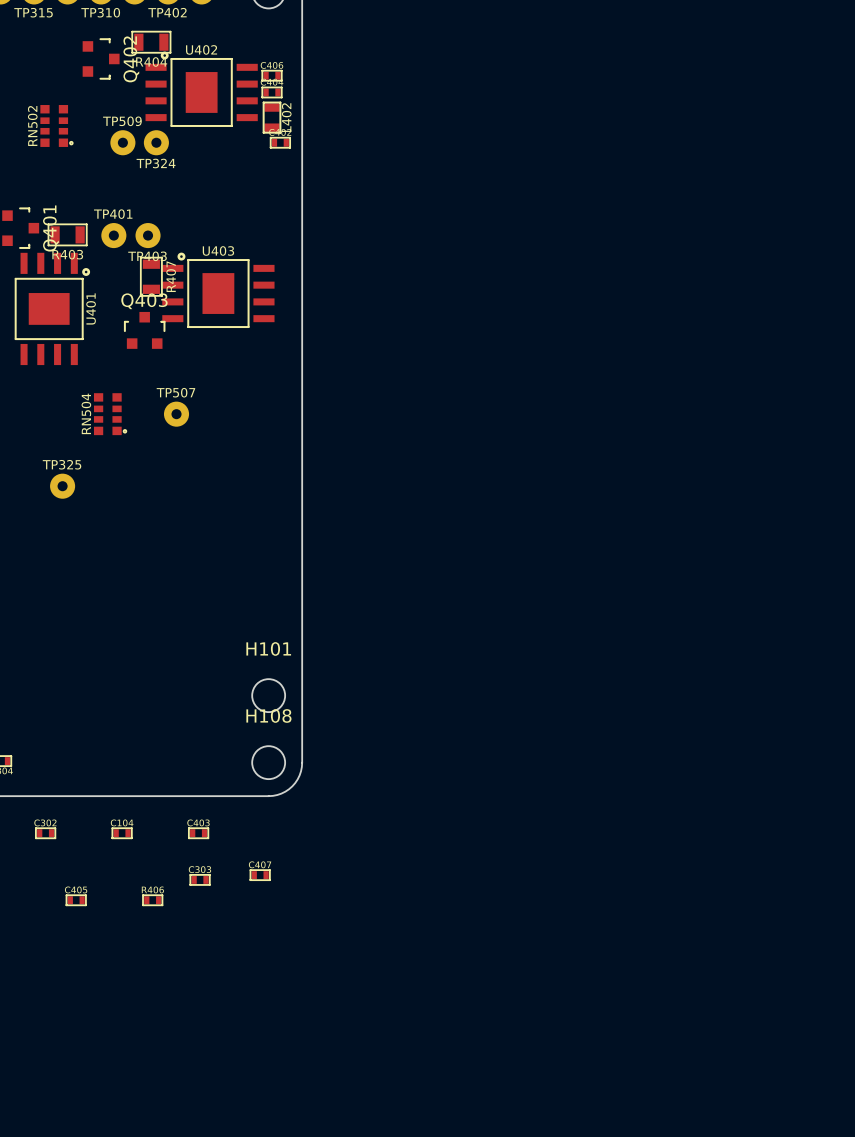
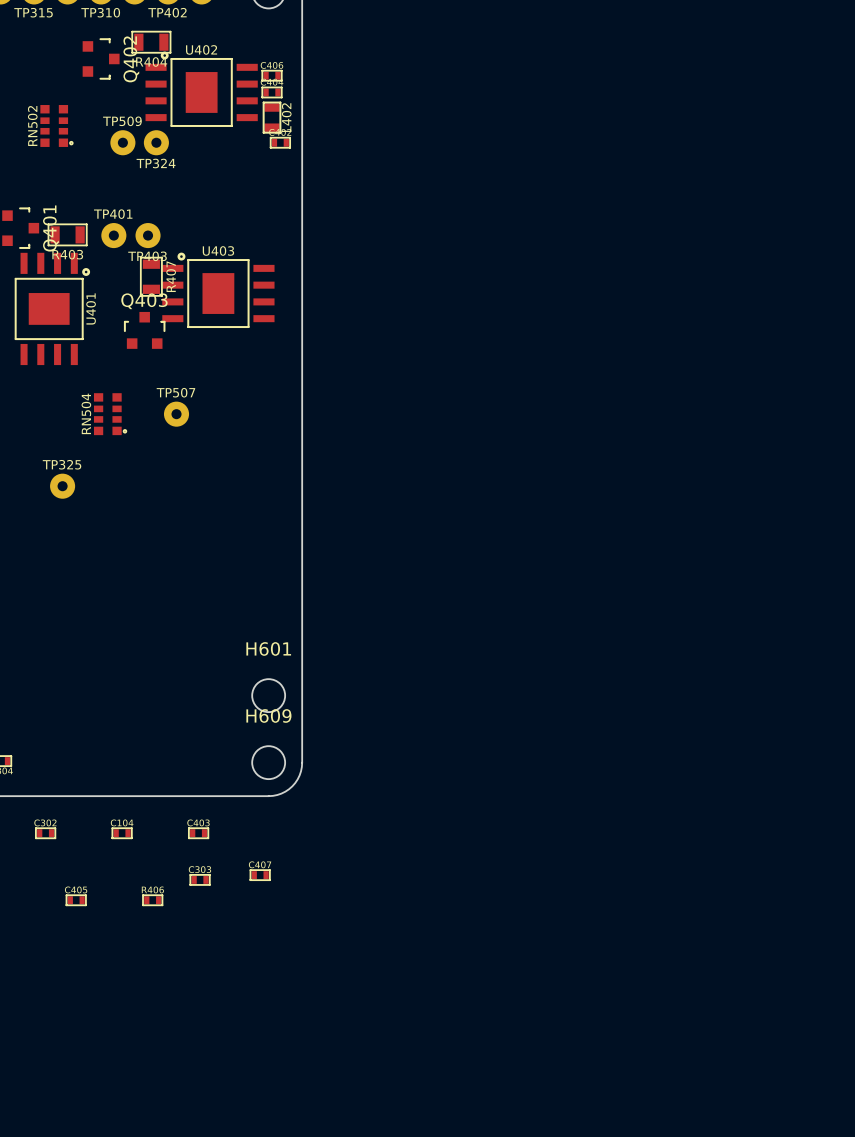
H101 name: H101 (268, 648) -> H601 (268, 648)
H108 name: H108 (268, 715) -> H609 (268, 715)

